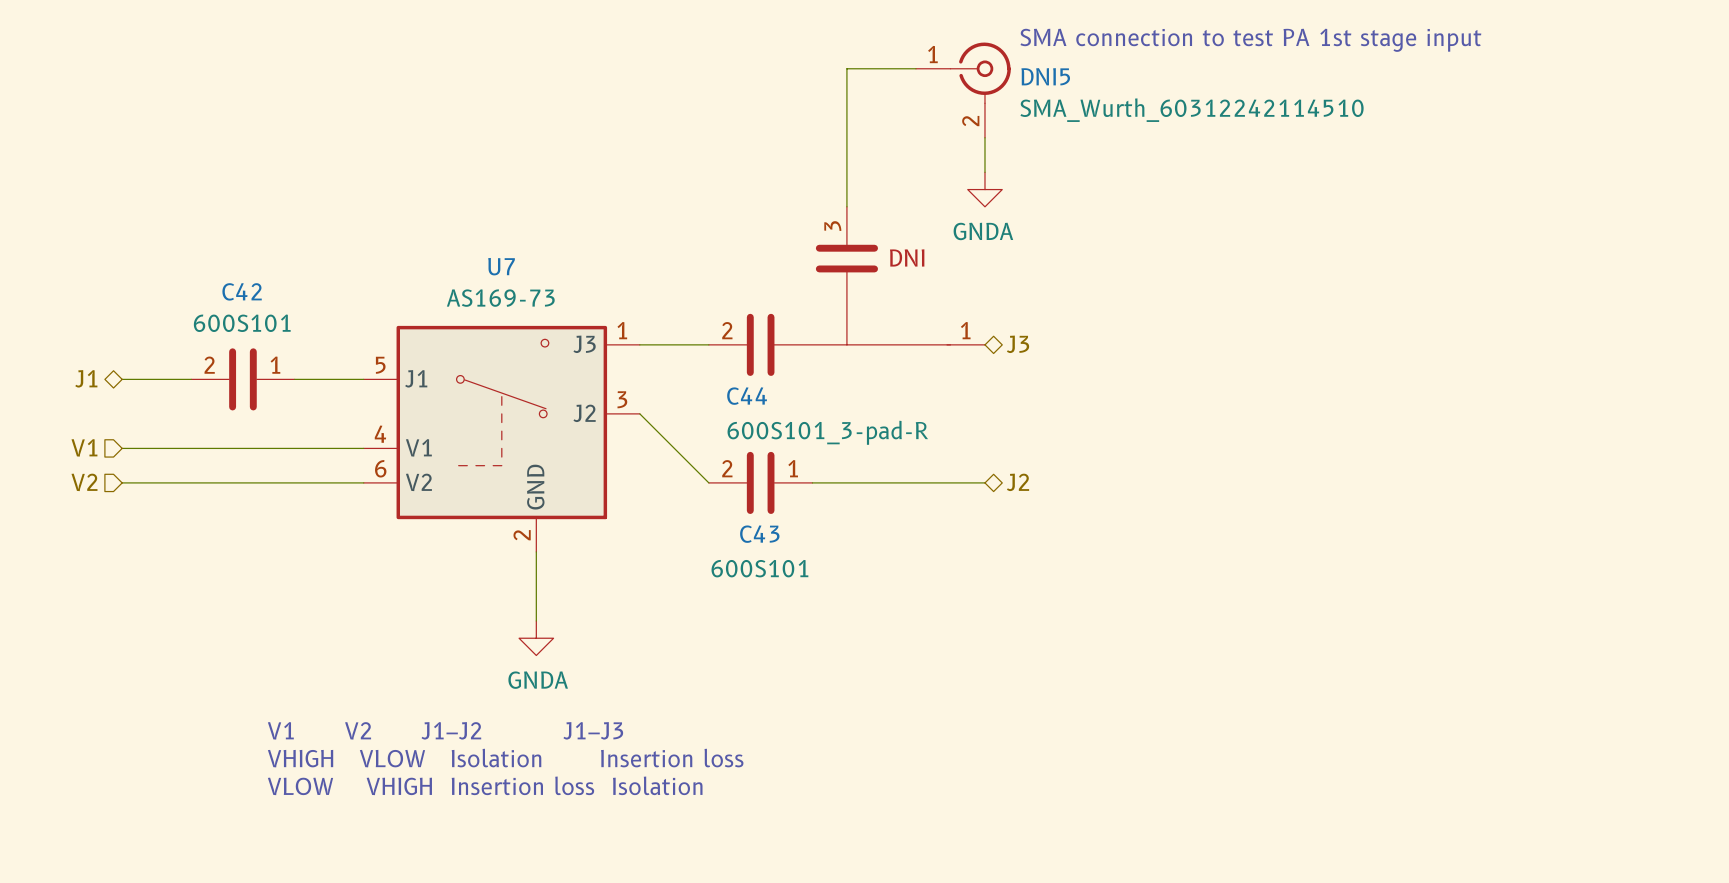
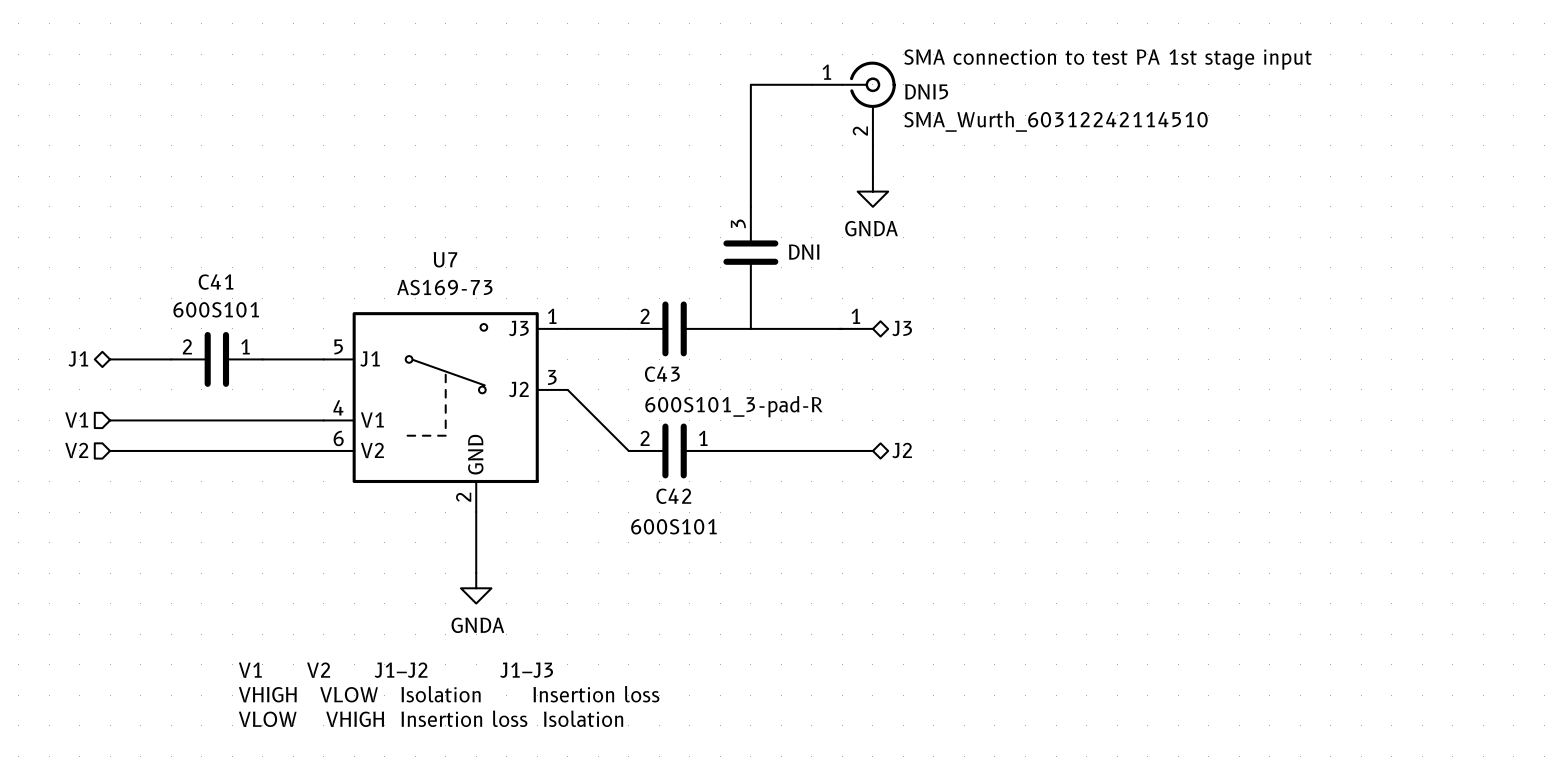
C42 name: C42 (242, 291) -> C41 (216, 282)
C44 name: C44 (747, 396) -> C43 (662, 374)
C43 name: C43 (759, 534) -> C42 (673, 496)

